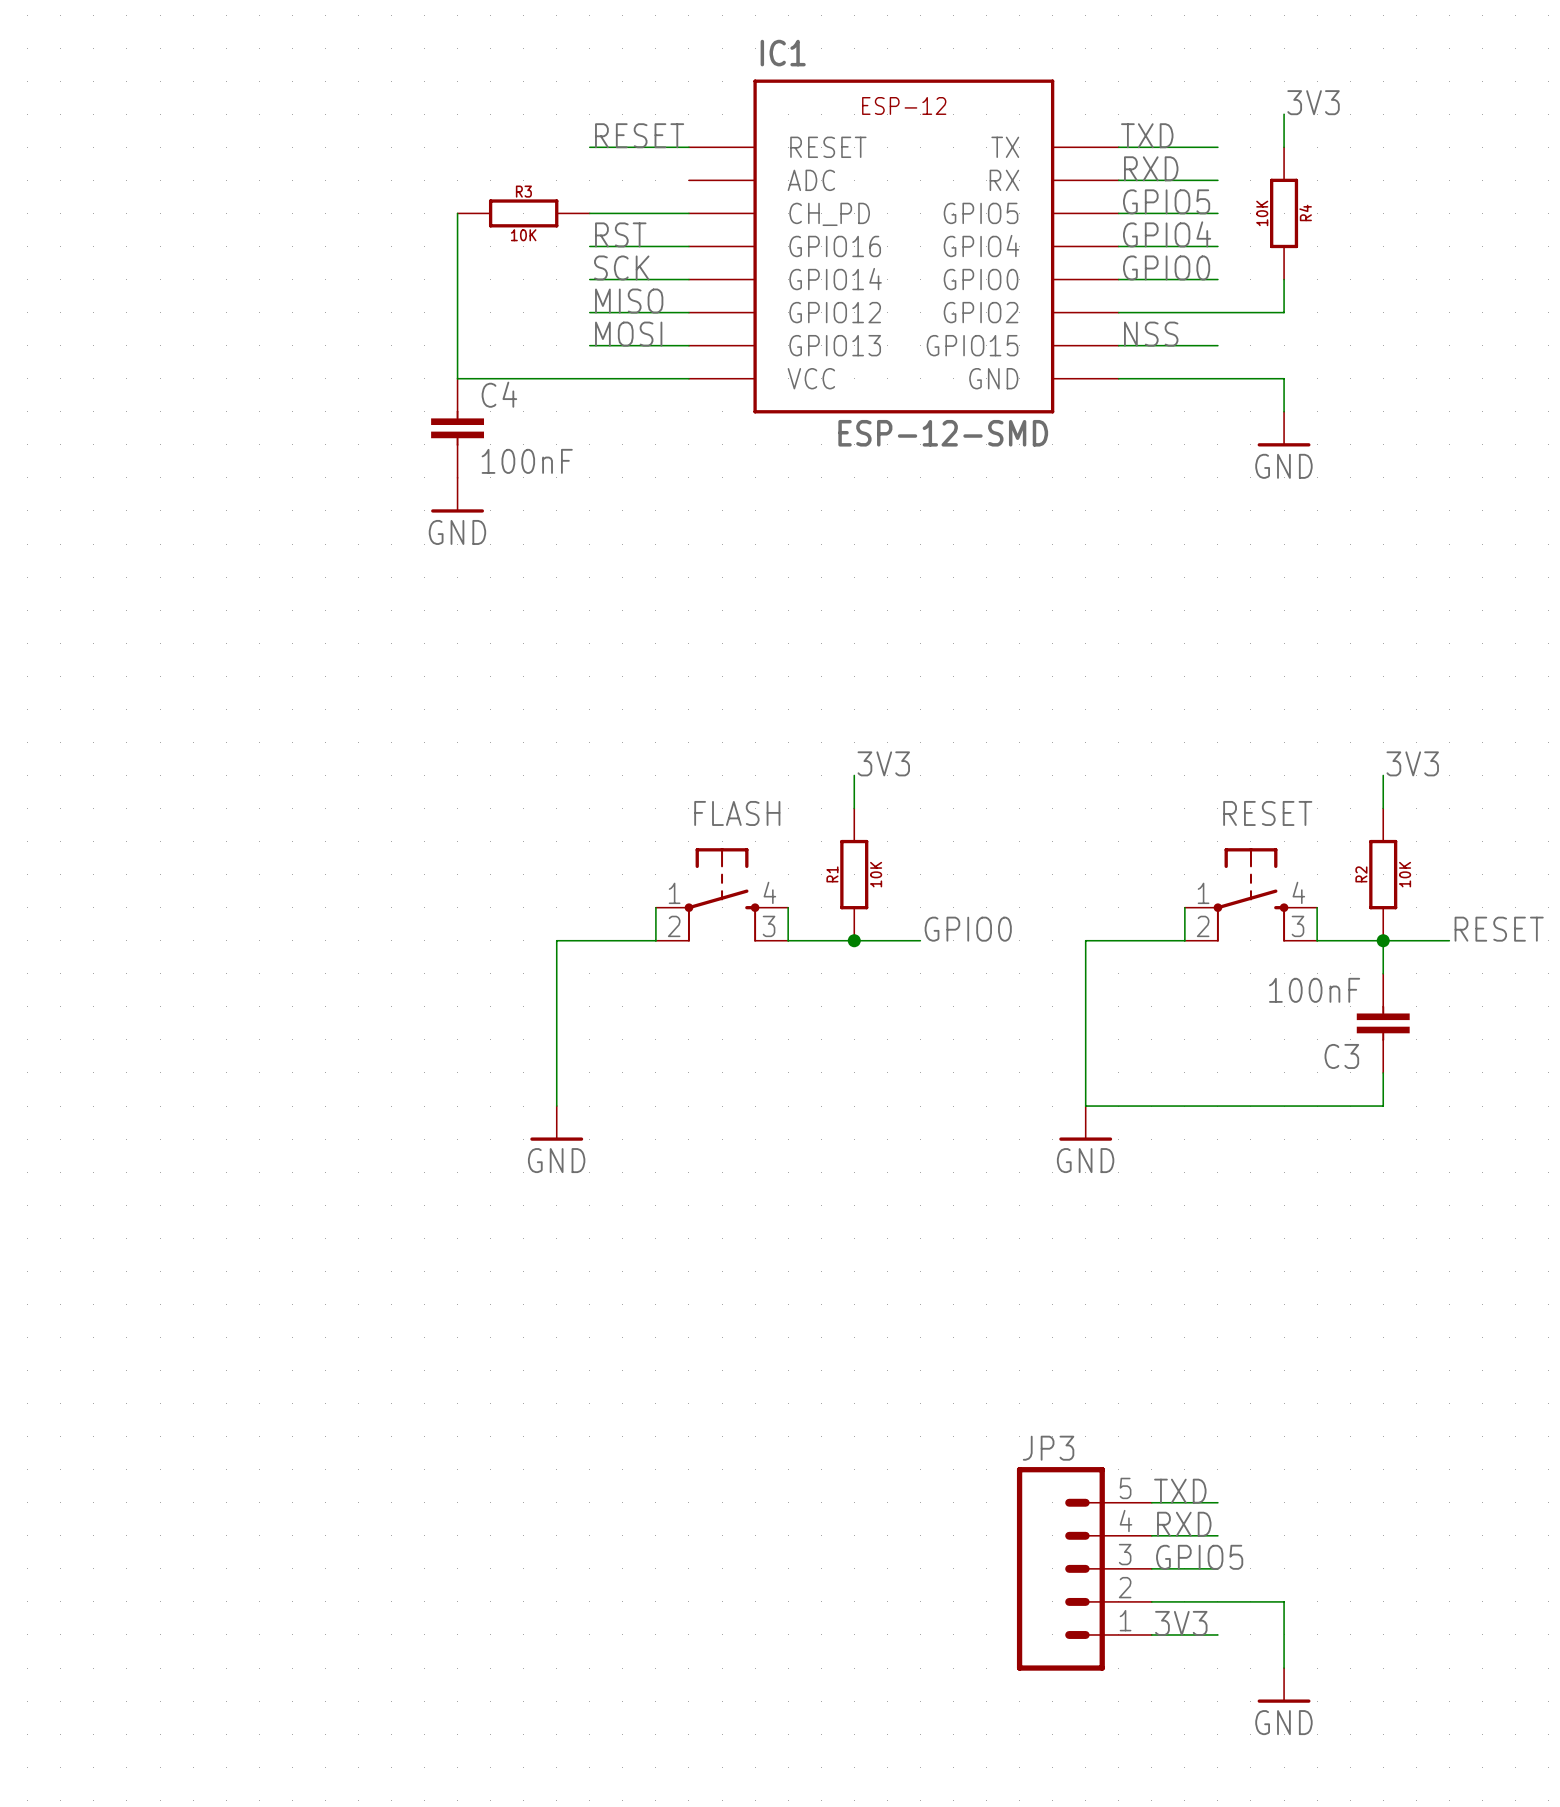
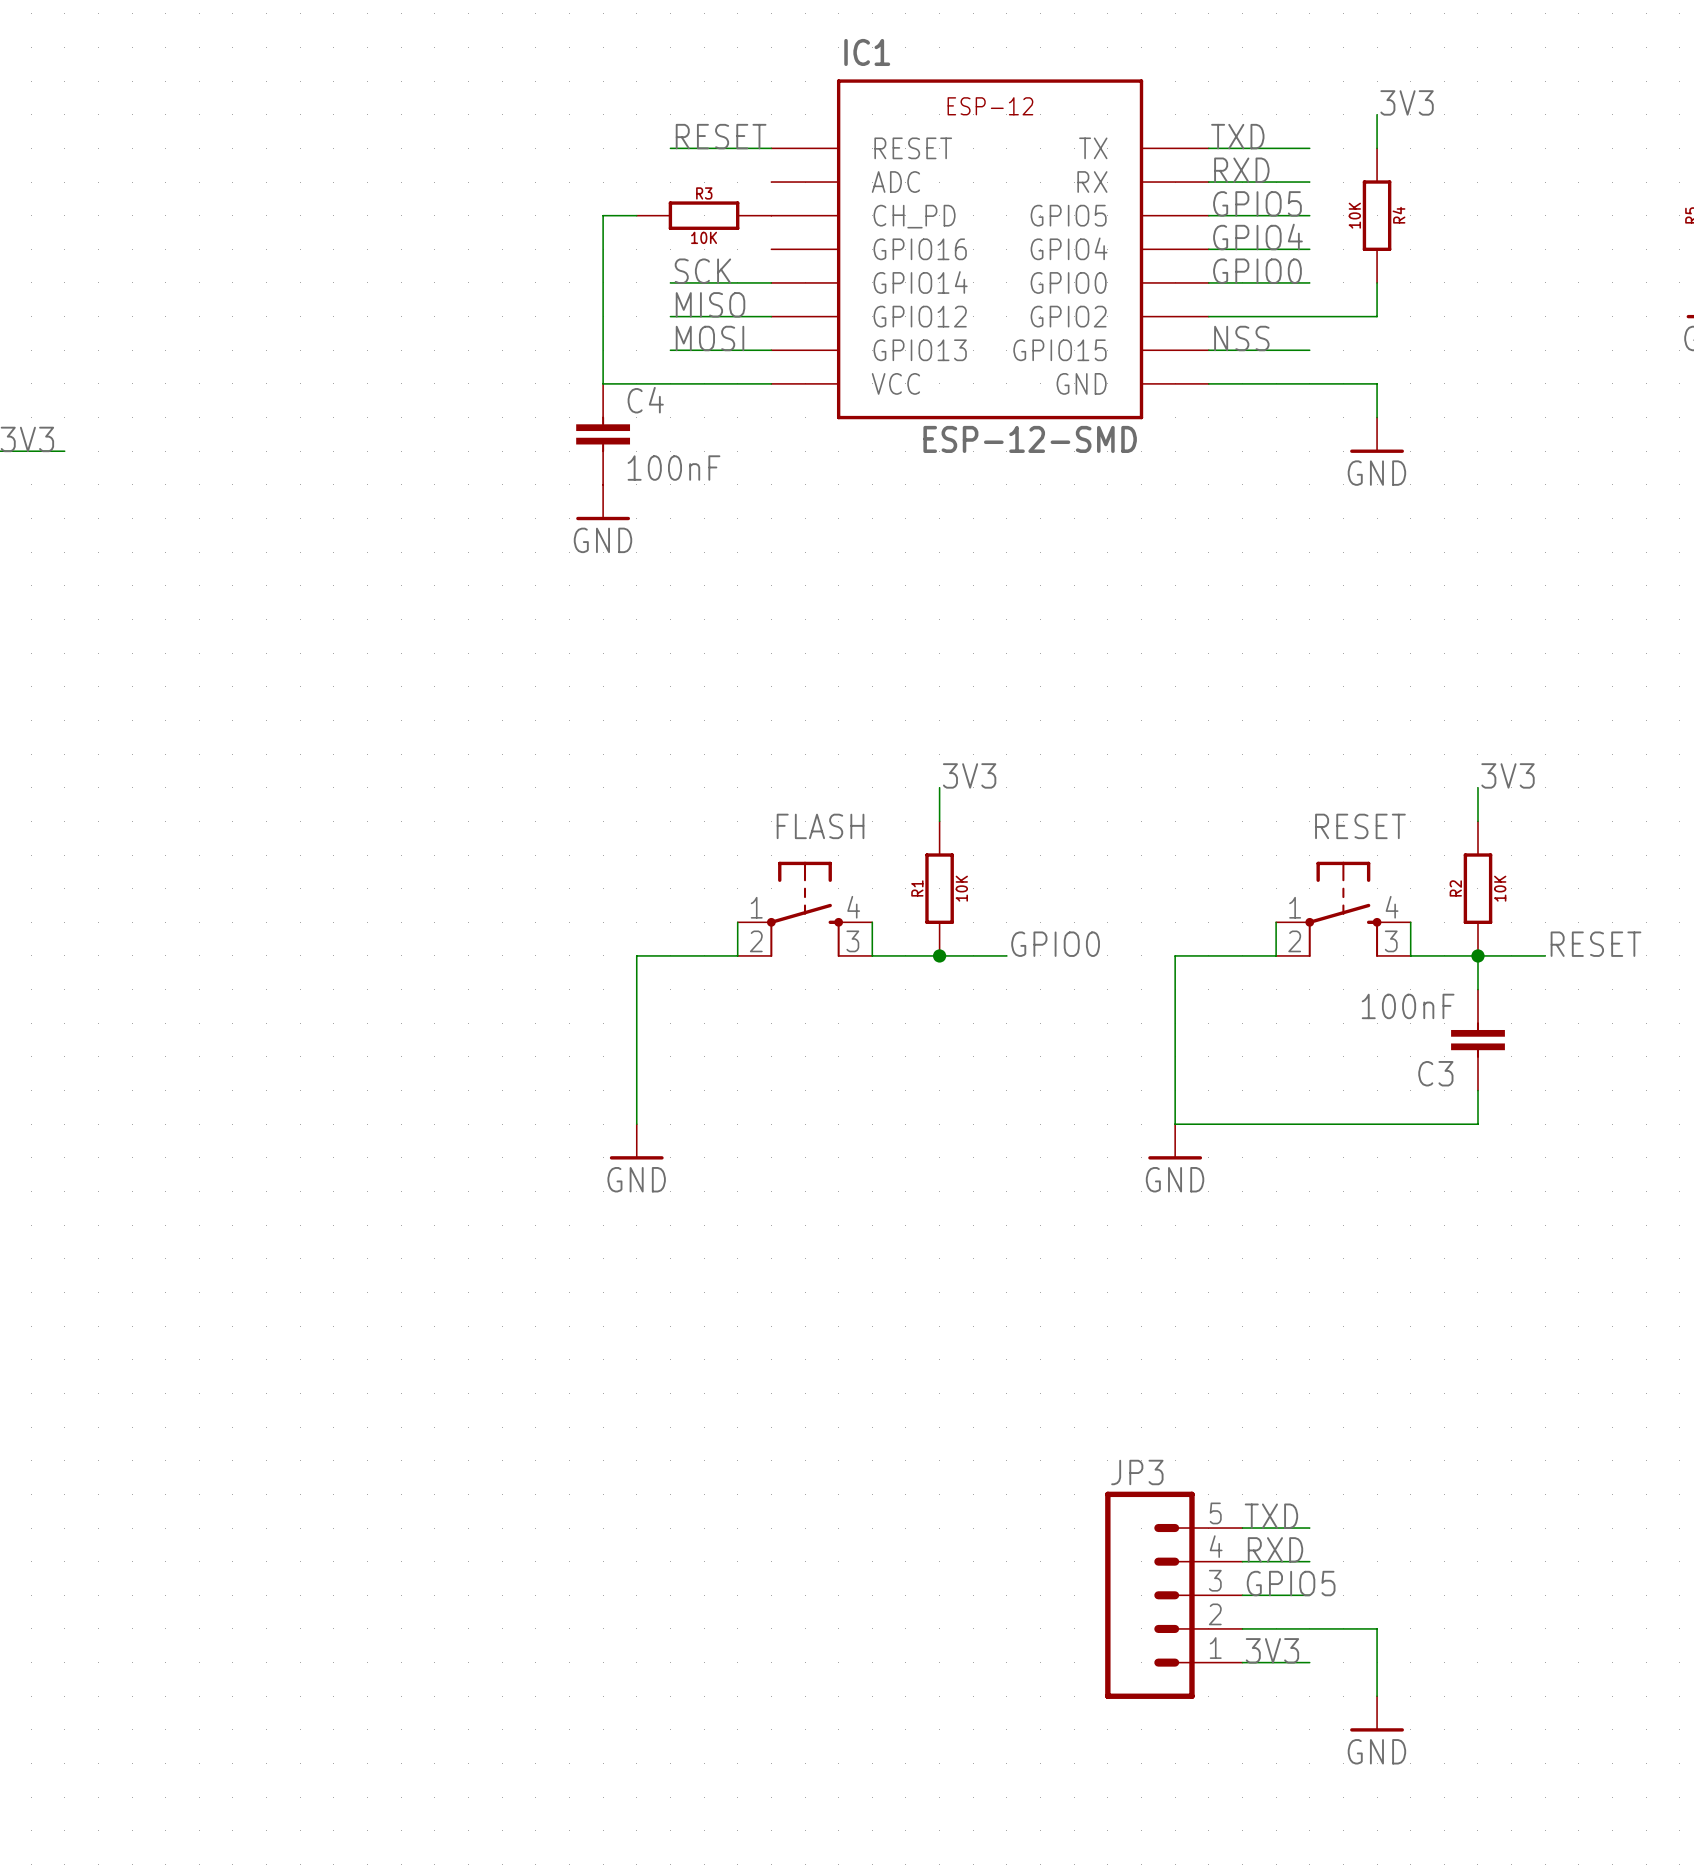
wire: (457, 213) (457, 378) (523, 378) -> (636, 215) (603, 215) (603, 383)
R3 position: (523, 213) -> (704, 215)
wire: (589, 213) (688, 213) -> none
label: RST (620, 234) -> none
wire: (589, 246) (688, 246) -> none
C4 position: (457, 428) -> (603, 434)
power symbol position: GND (457, 495) -> GND (603, 502)

